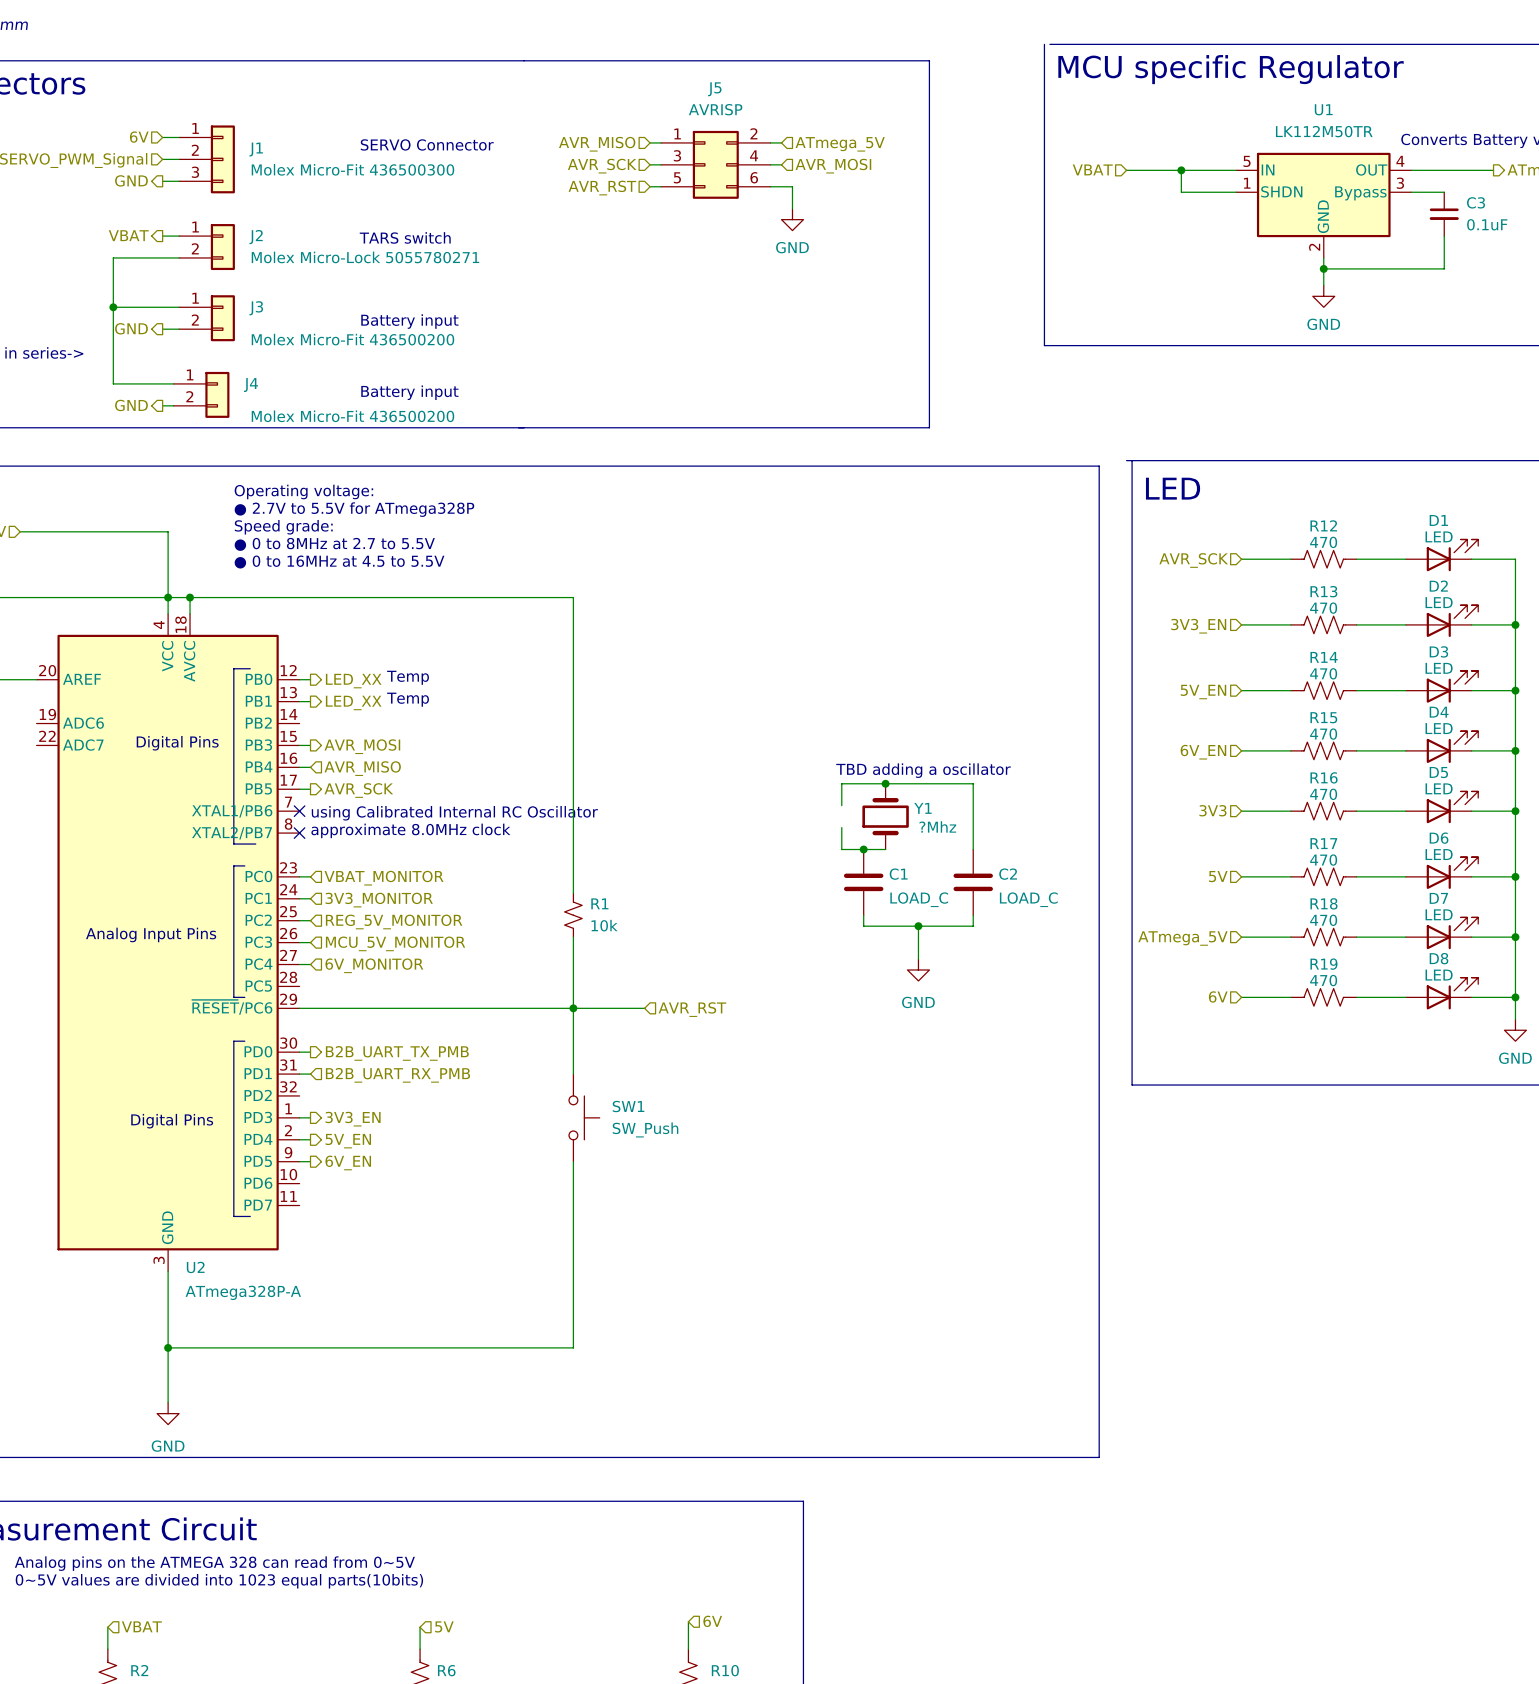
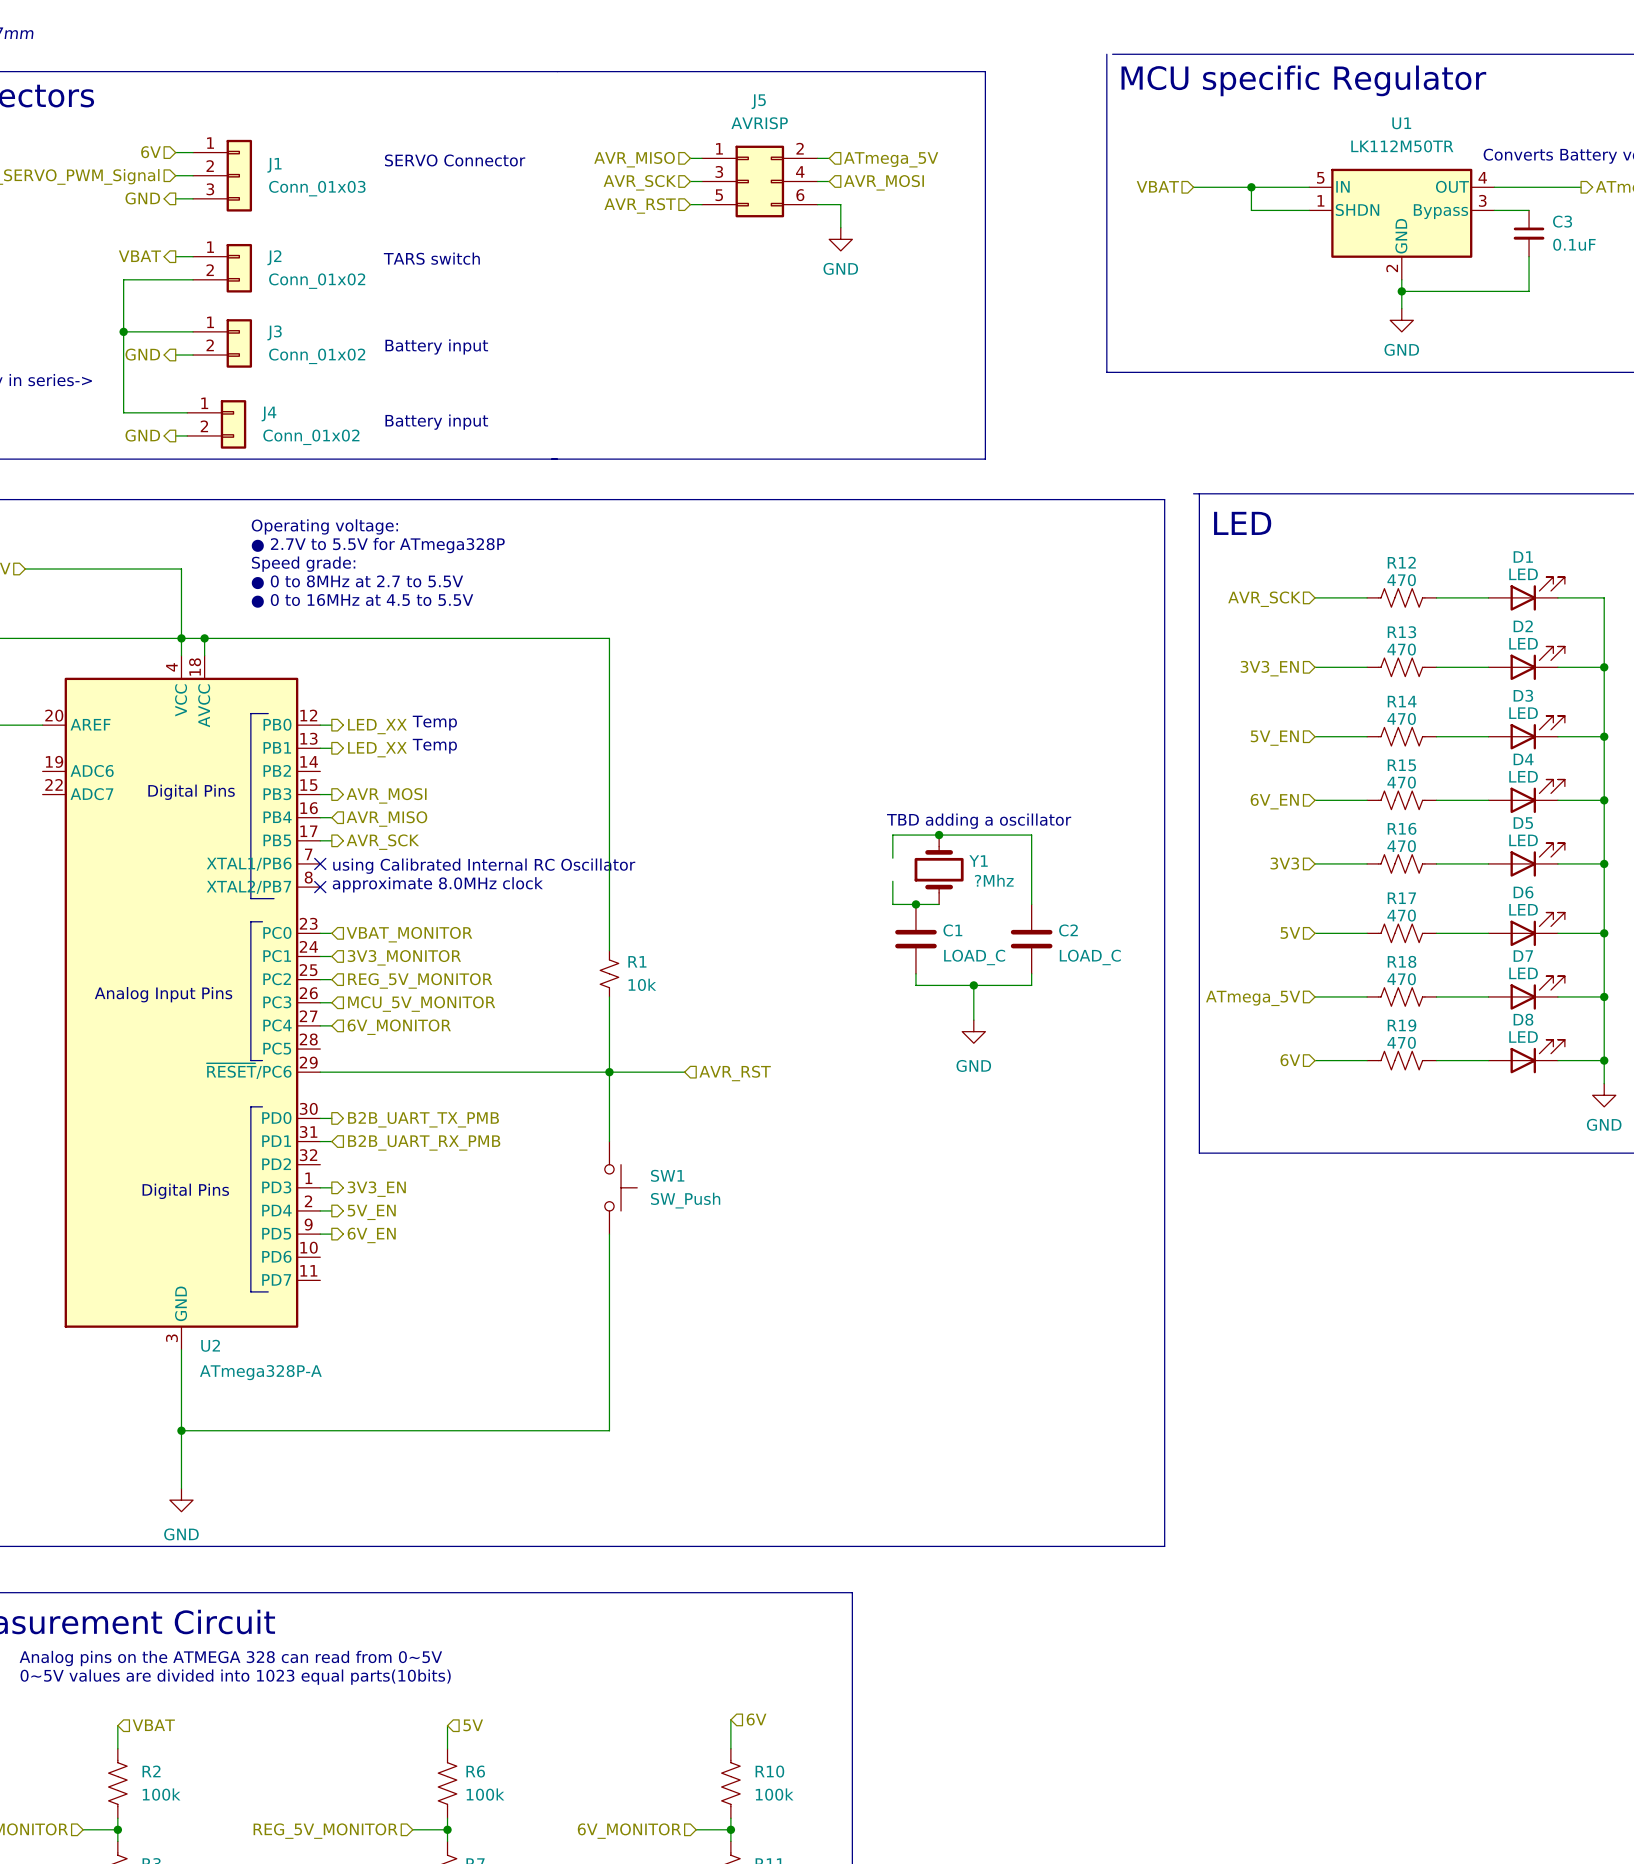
J1 value: Molex Micro-Fit 436500300 (352, 169) -> Conn_01x03 (317, 188)
J2 value: Molex Micro-Lock 5055780271 (365, 257) -> Conn_01x02 (317, 281)
J3 value: Molex Micro-Fit 436500200 (352, 339) -> Conn_01x02 (317, 356)
J4 value: Molex Micro-Fit 436500200 (352, 416) -> Conn_01x02 (311, 437)

